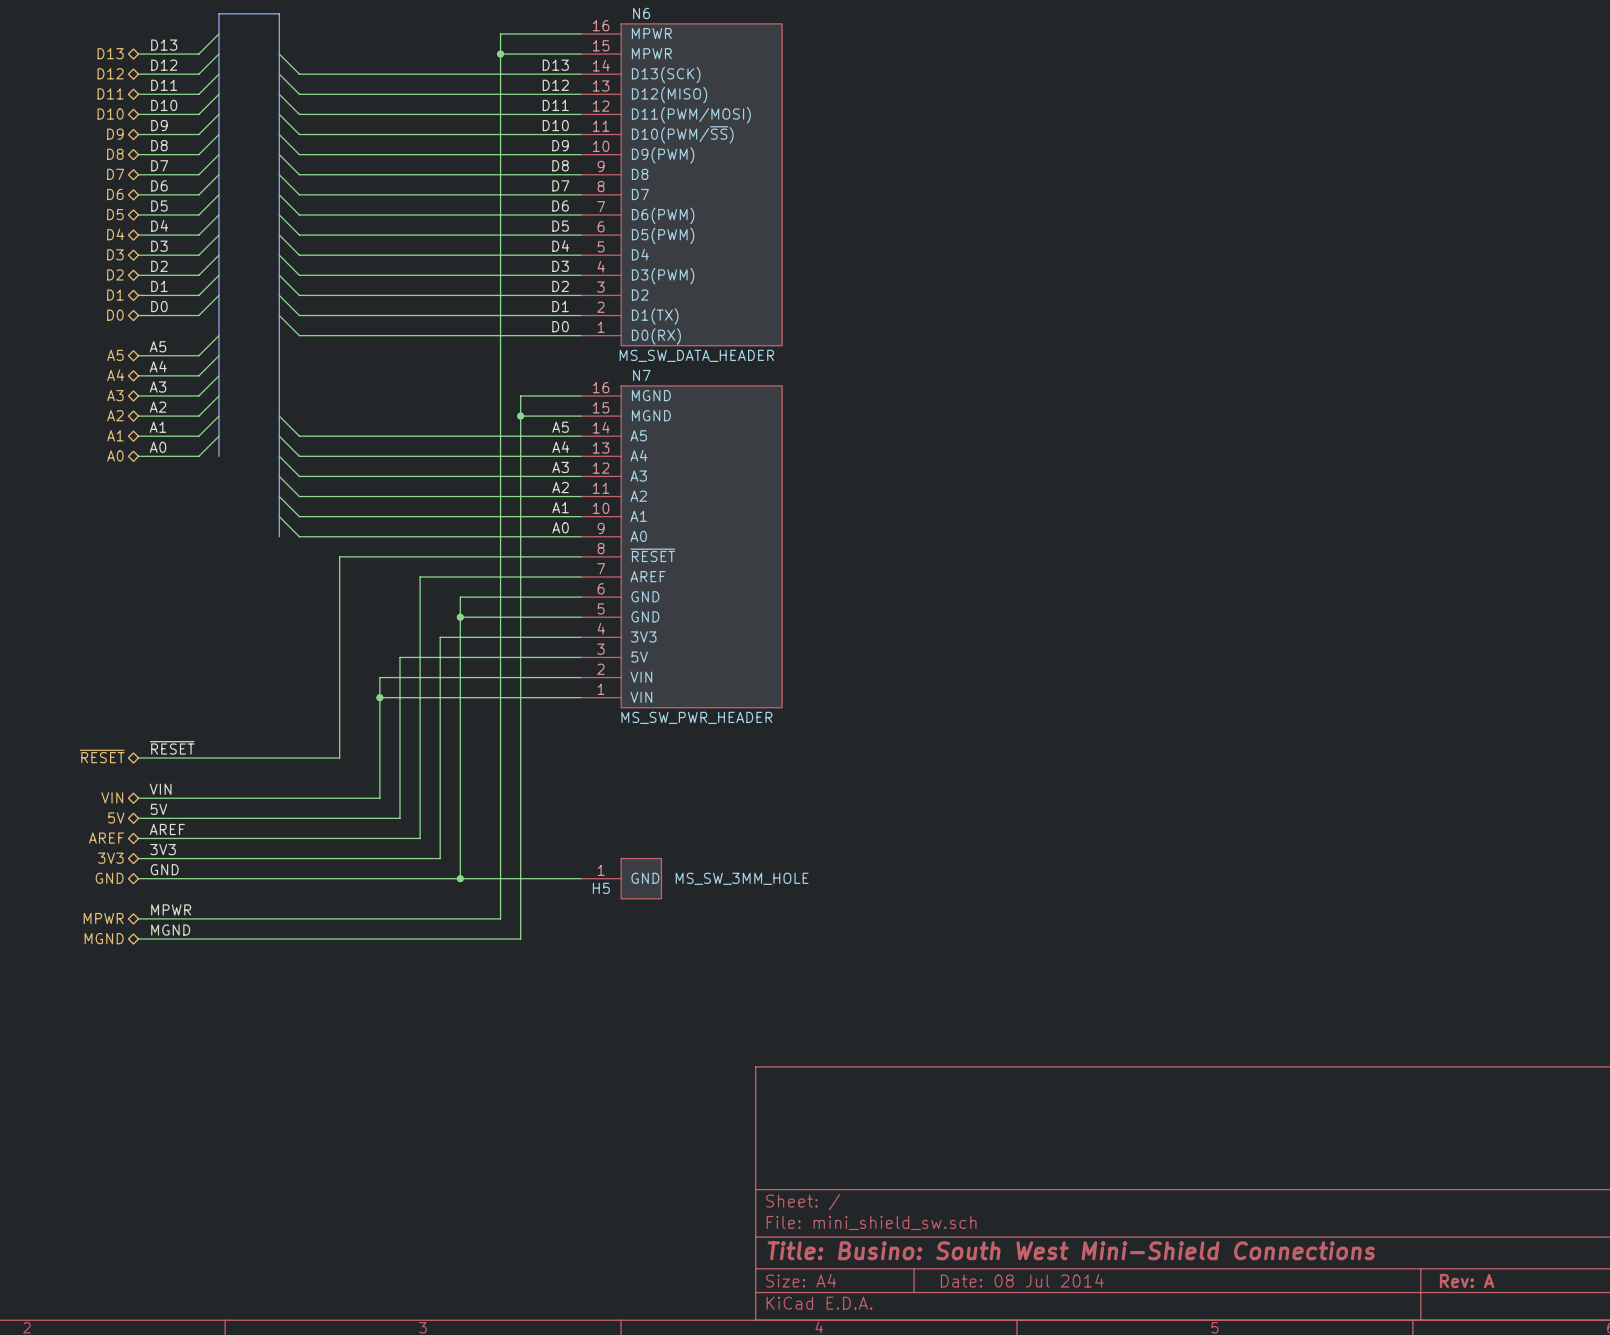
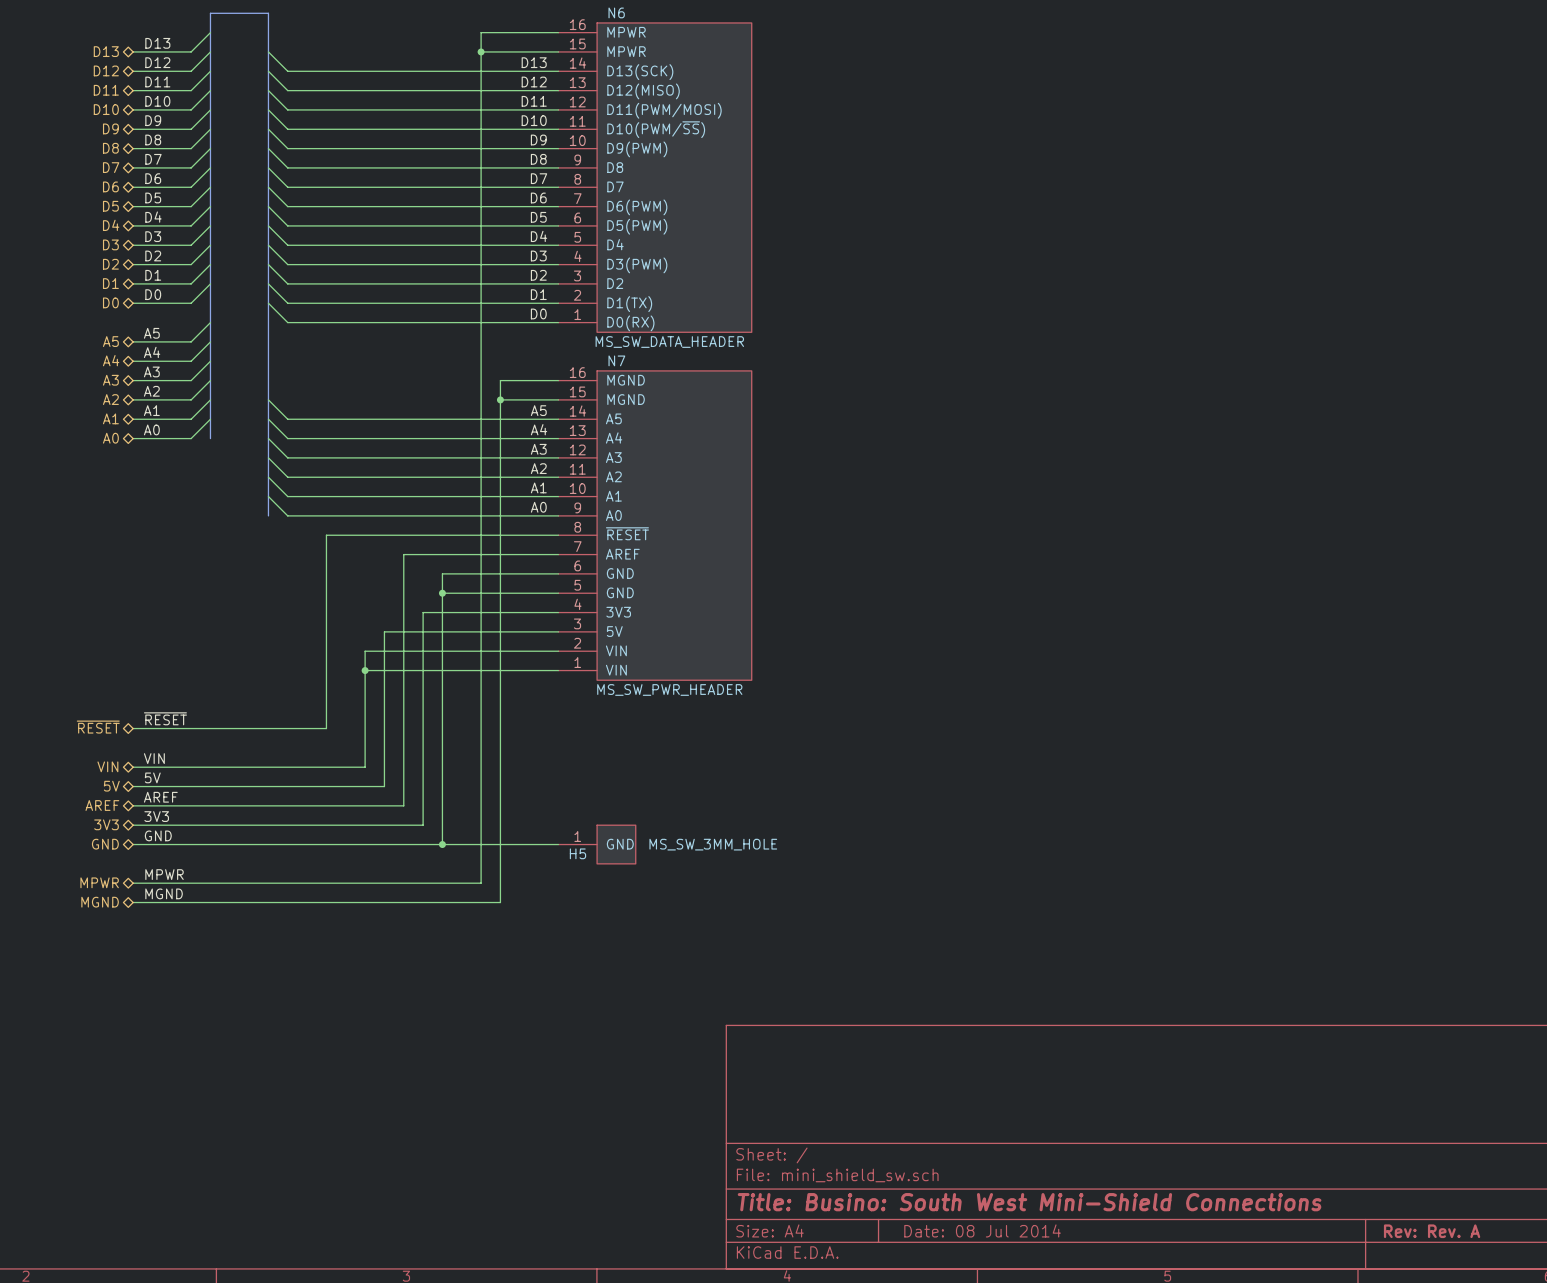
title block: Rev: A (1467, 1281) -> Rev: Rev. A (1432, 1231)

